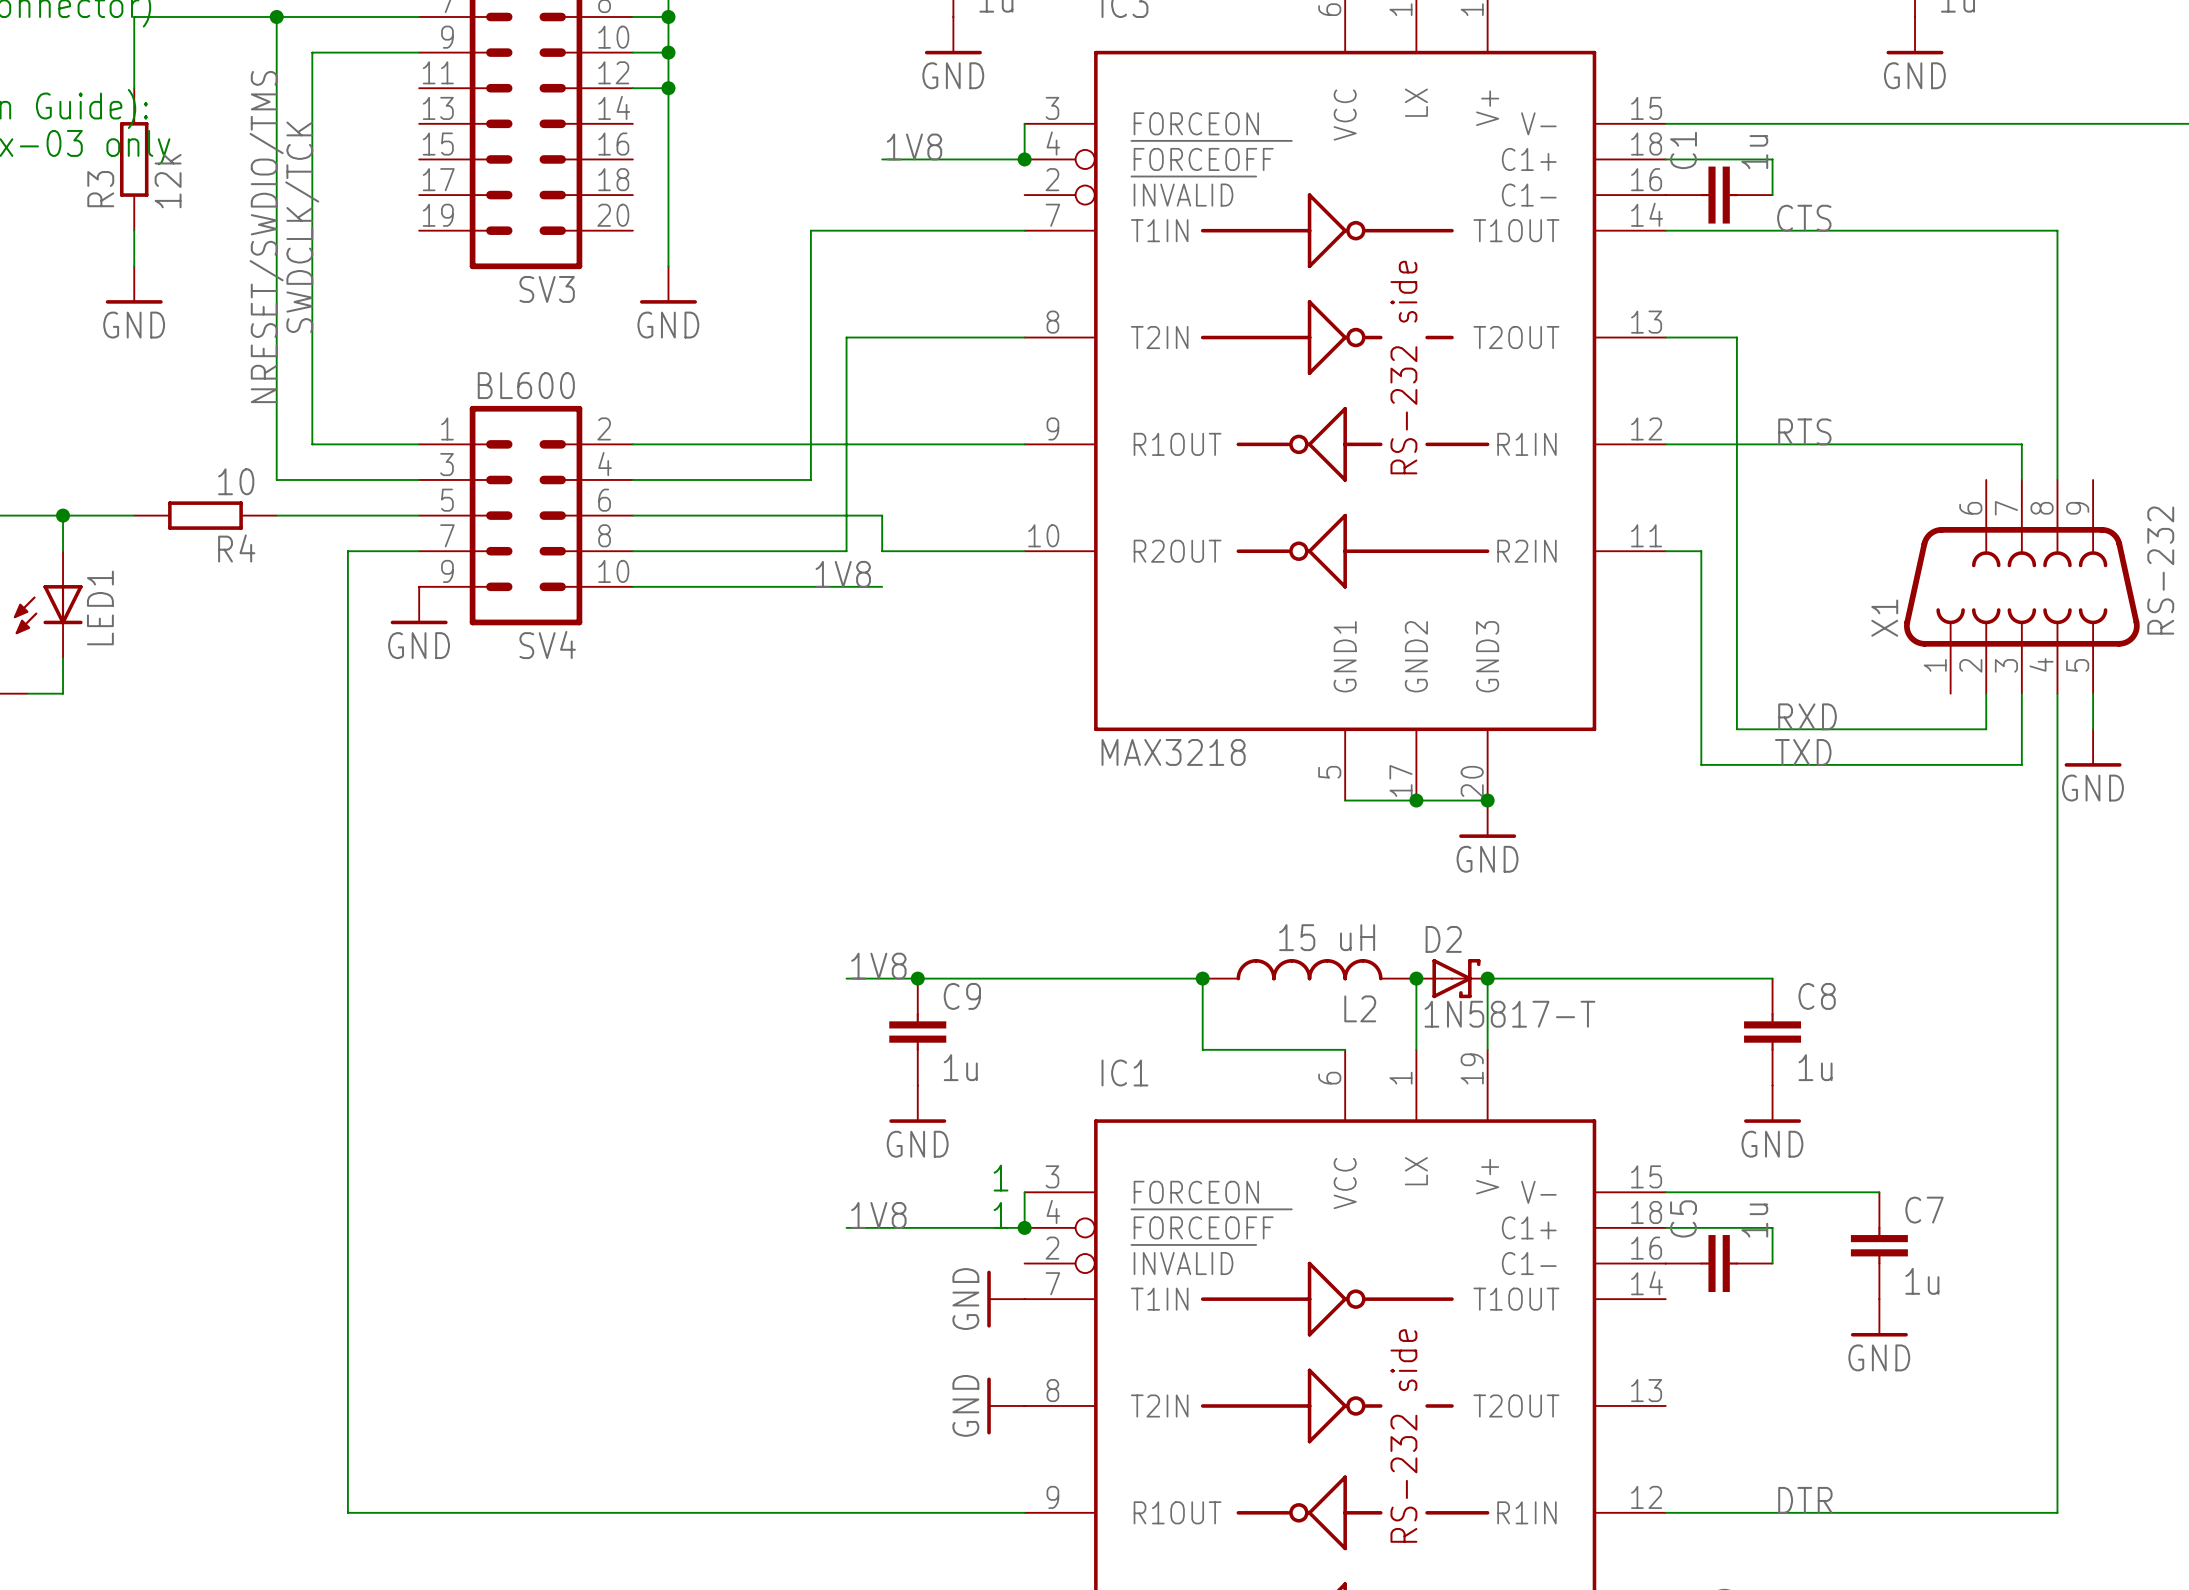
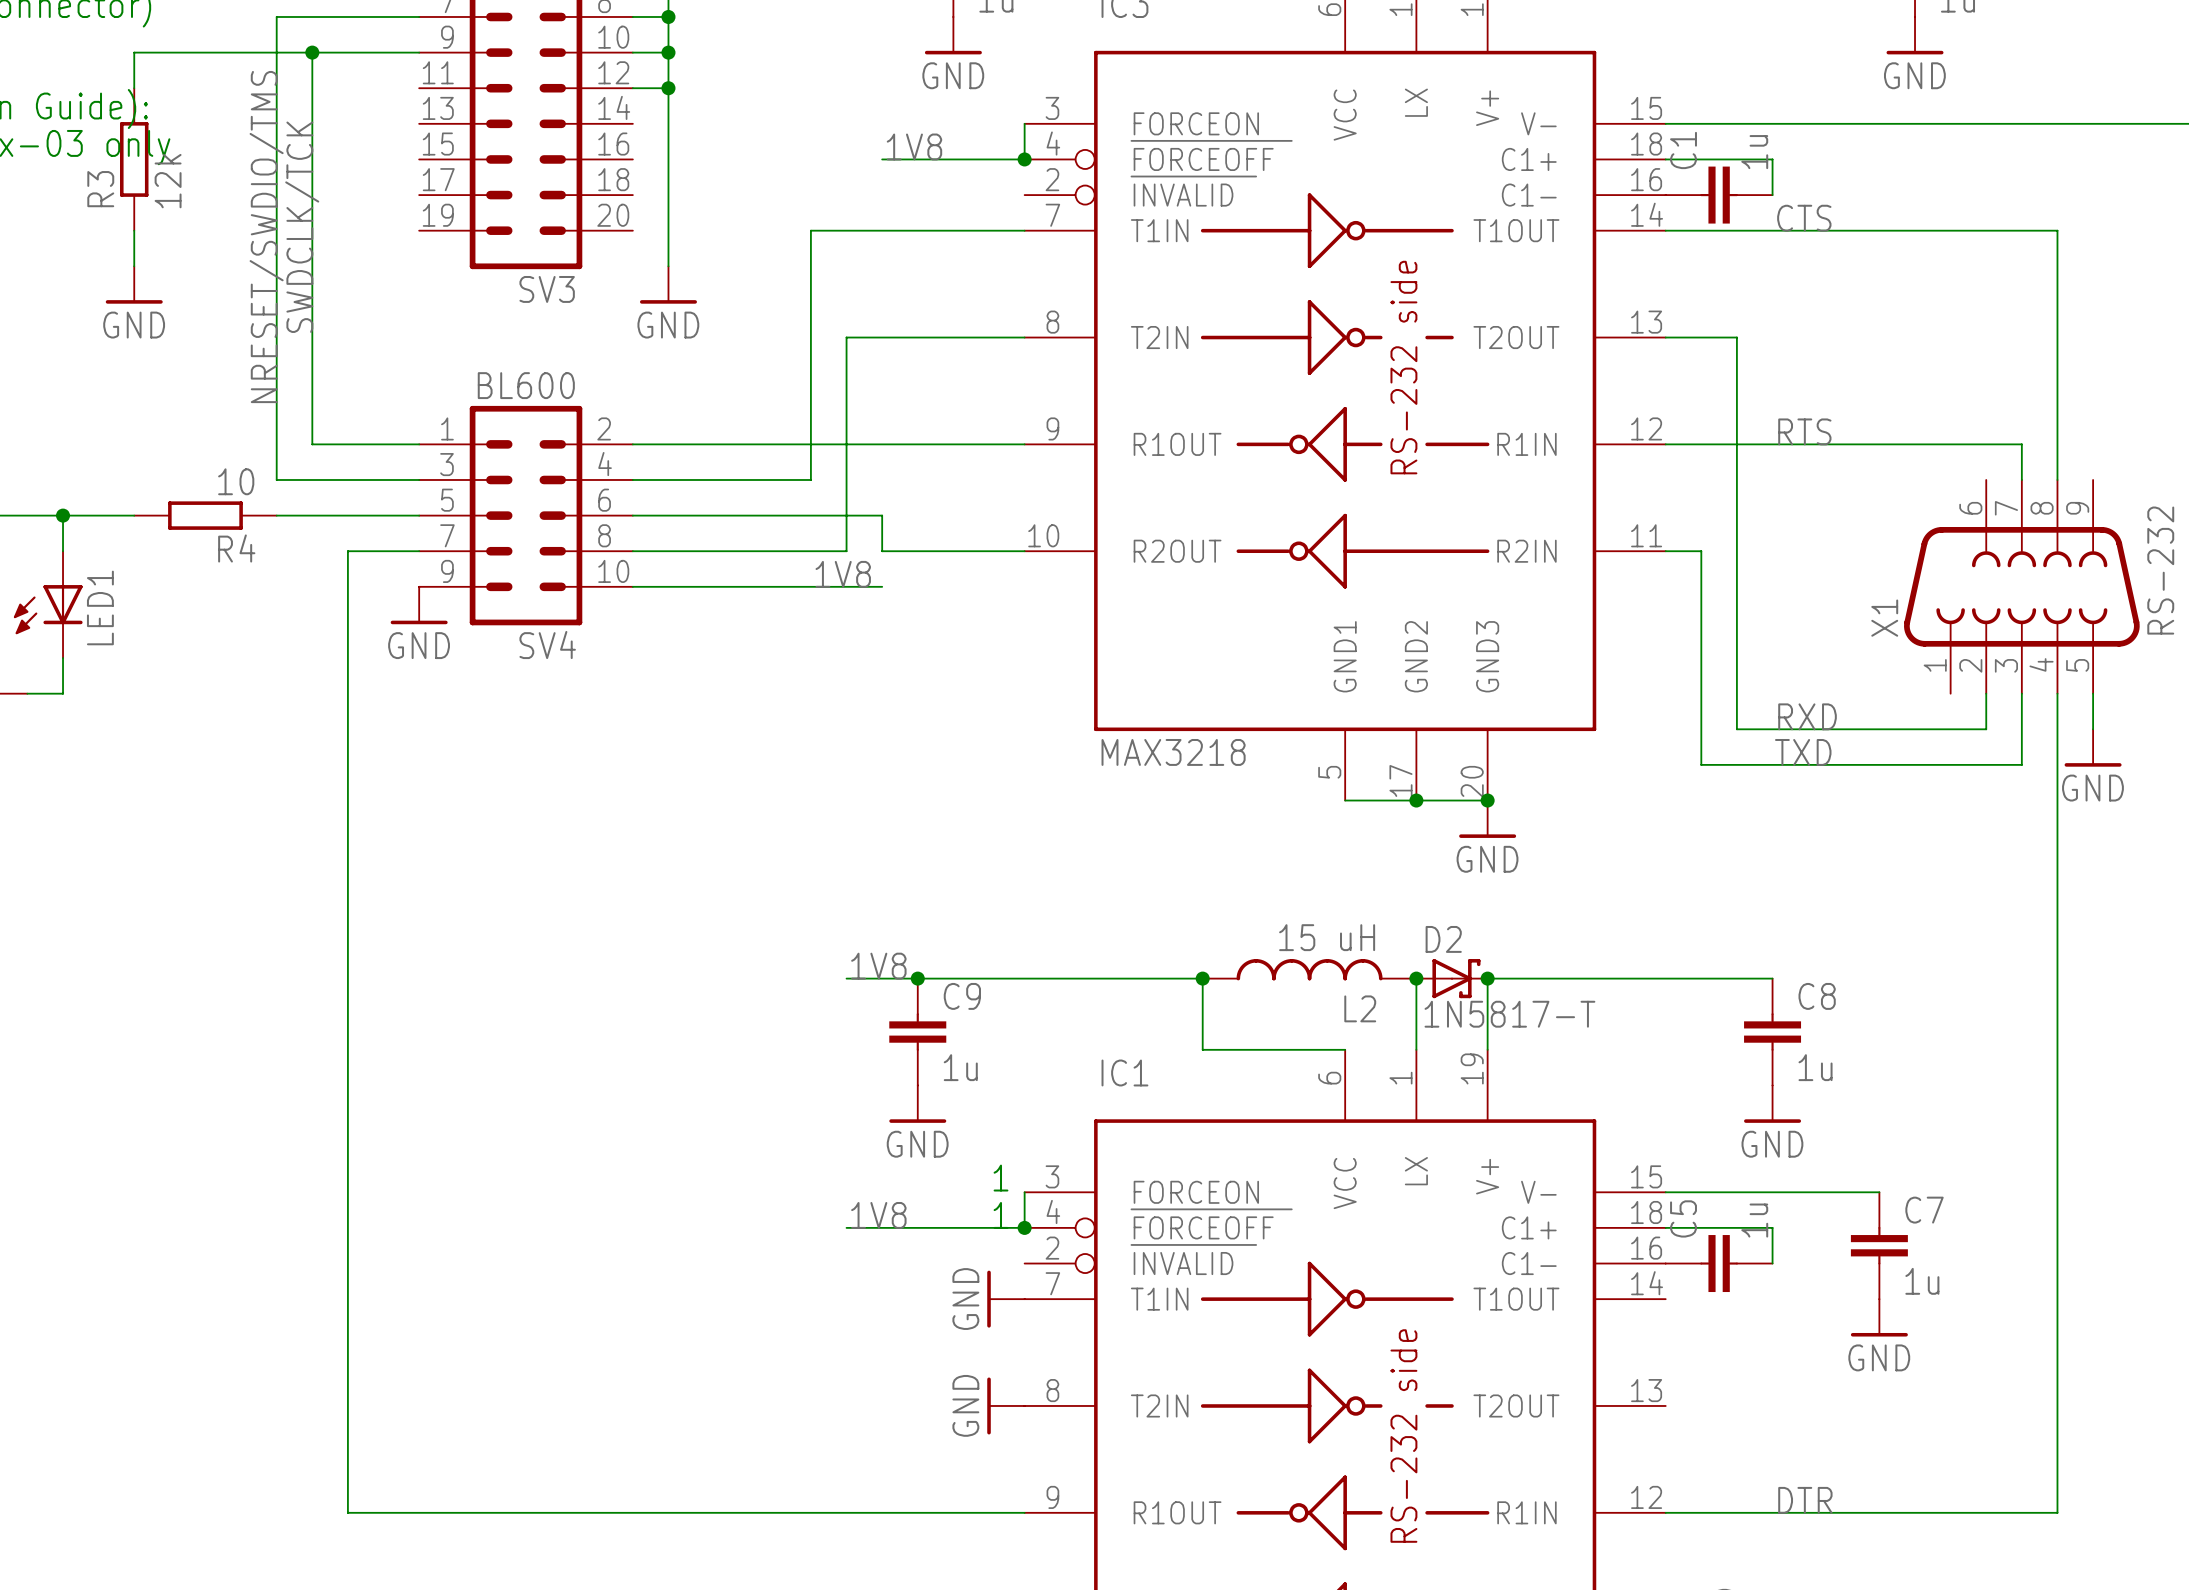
wire: (276, 16) (134, 16) (134, 52) -> (312, 52) (134, 52)
junction position: (276, 16) -> (312, 52)

